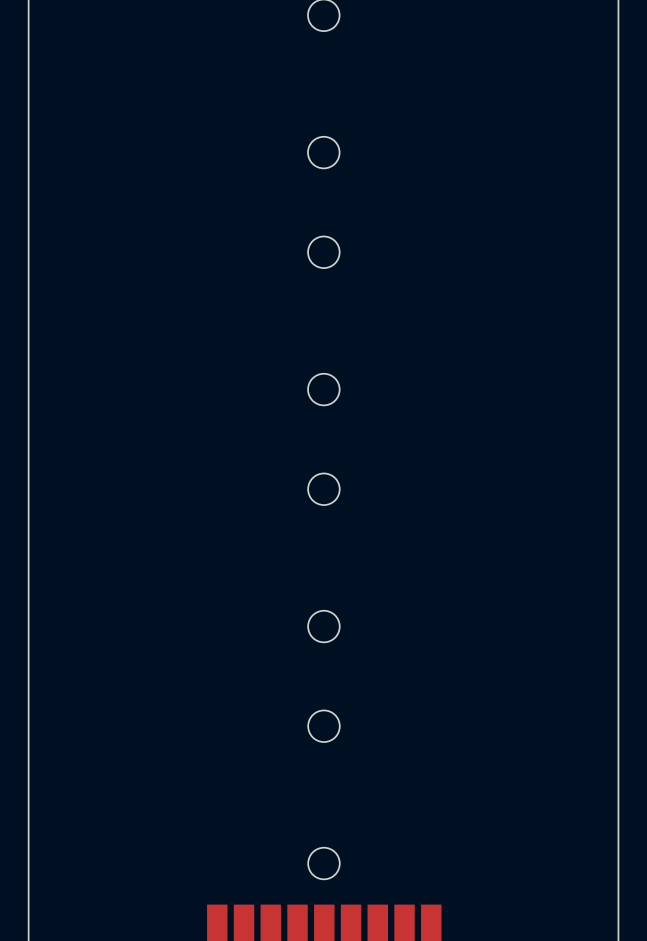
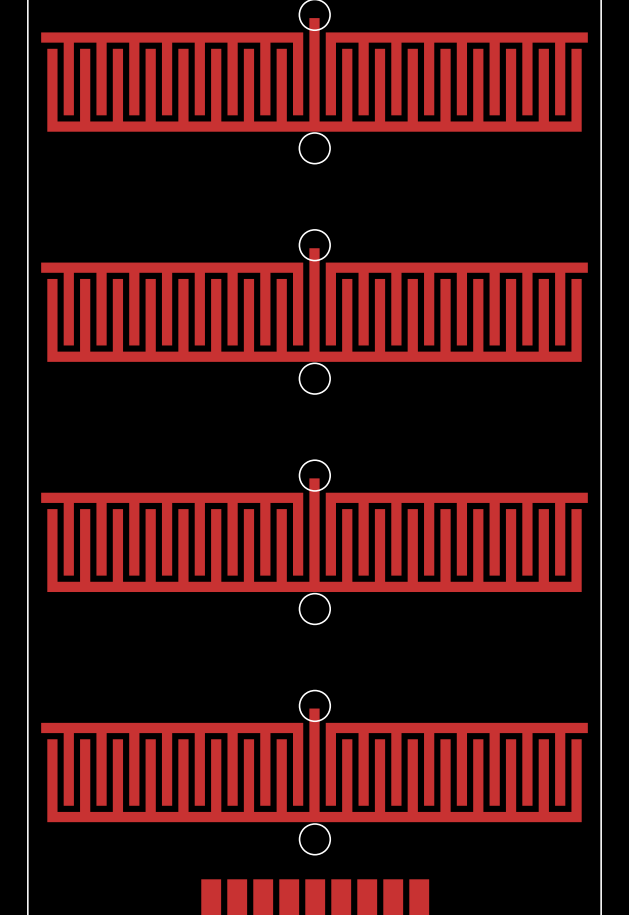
part: none -> (314, 74)
part: none -> (314, 305)
part: none -> (314, 535)
part: none -> (314, 765)

